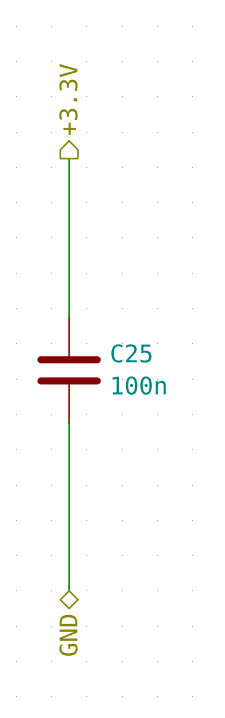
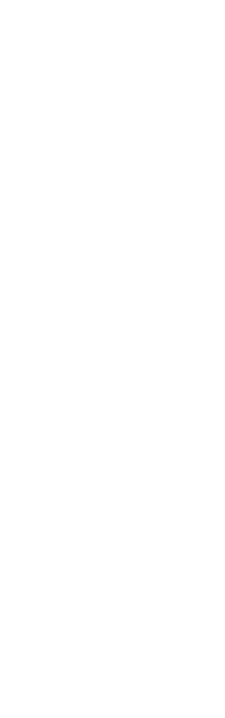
hierarchical label: +3.3V (68, 99) -> none
wire: (69, 158) (69, 317) -> none
C25: 100n (69, 370) -> none
wire: (69, 423) (69, 590) -> none
hierarchical label: GND (68, 635) -> none

